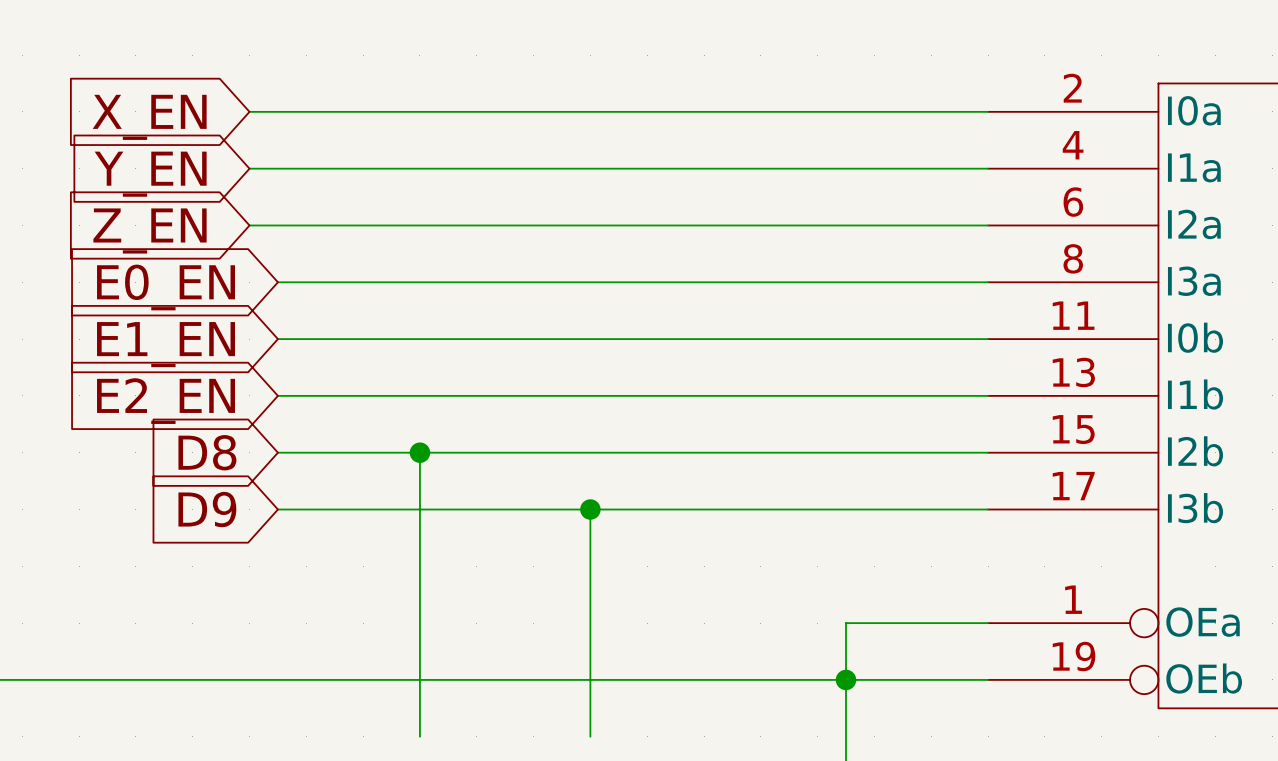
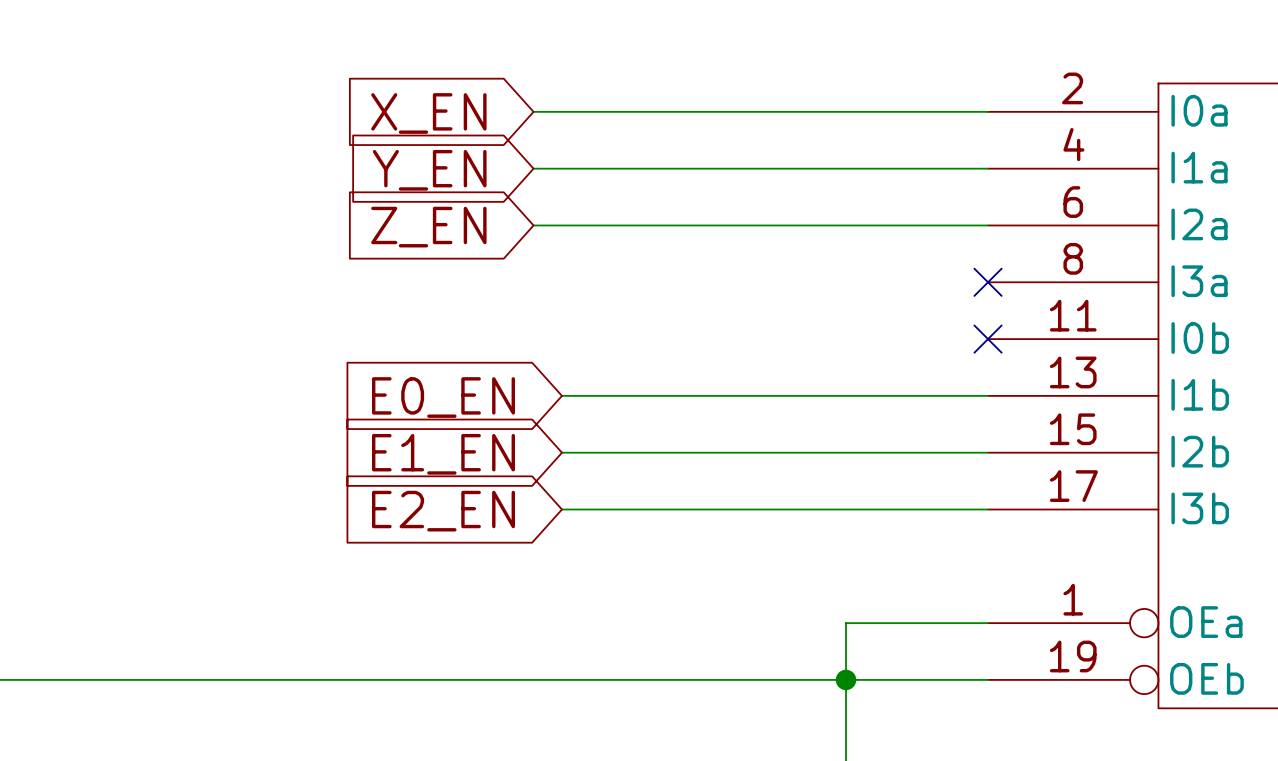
wire: (249, 111) (533, 111) -> none
global label position: X_EN (149, 117) -> X_EN (428, 113)
wire: (249, 168) (533, 168) -> none
global label position: Y_EN (150, 174) -> Y_EN (429, 170)
wire: (249, 225) (533, 225) -> none
global label position: Z_EN (150, 230) -> Z_EN (428, 227)
wire: (277, 282) (988, 282) -> none
no-connect mark: none -> (988, 282)
global label position: E0_EN (166, 287) -> E0_EN (443, 397)
wire: (277, 339) (988, 339) -> none
no-connect mark: none -> (988, 339)
global label position: E1_EN (166, 344) -> E1_EN (443, 454)
wire: (277, 395) (561, 395) -> none
global label position: E2_EN (166, 401) -> E2_EN (443, 511)
global label: D8 (207, 452) -> none
wire: (277, 452) (561, 452) -> none
wire: (419, 452) (419, 736) -> none
junction: (419, 452) -> none
global label: D9 (207, 509) -> none
wire: (277, 509) (561, 509) -> none
wire: (590, 509) (590, 736) -> none
junction: (590, 509) -> none

